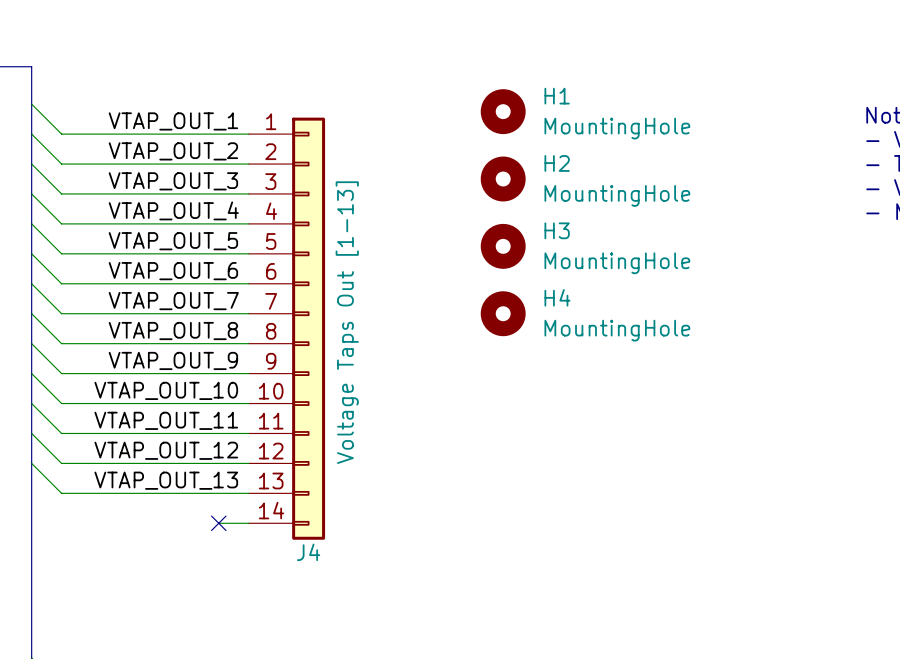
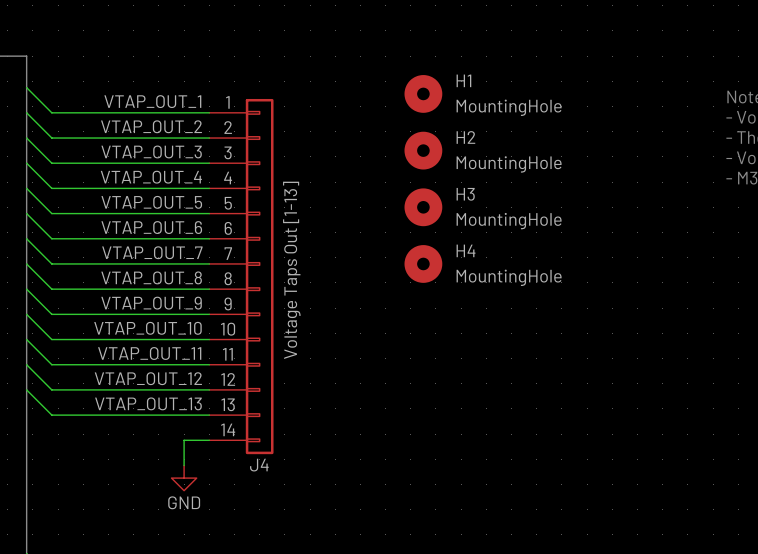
wire: none -> (184, 440) (184, 465)
no-connect mark: (218, 523) -> none
power symbol: none -> GND (184, 478)

